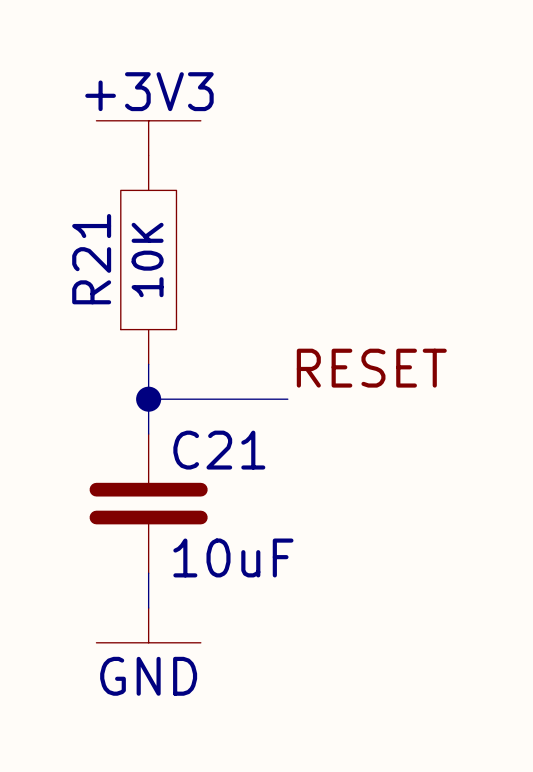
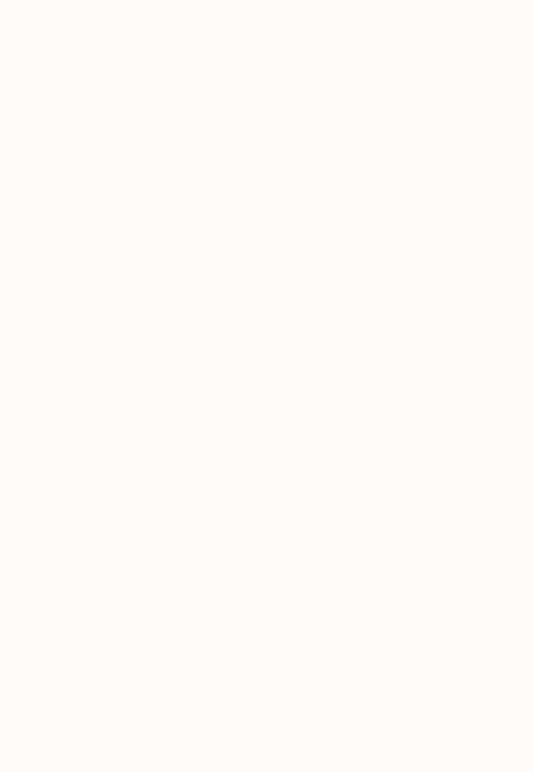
power symbol: +3V3 (148, 138) -> none
R21: 10K (148, 259) -> none
wire: (148, 364) (148, 433) -> none
label: RESET (371, 368) -> none
wire: (148, 399) (287, 399) -> none
junction: (148, 399) -> none
C21: 10uF (148, 503) -> none
wire: (148, 573) (148, 607) -> none
power symbol: GND (148, 625) -> none

